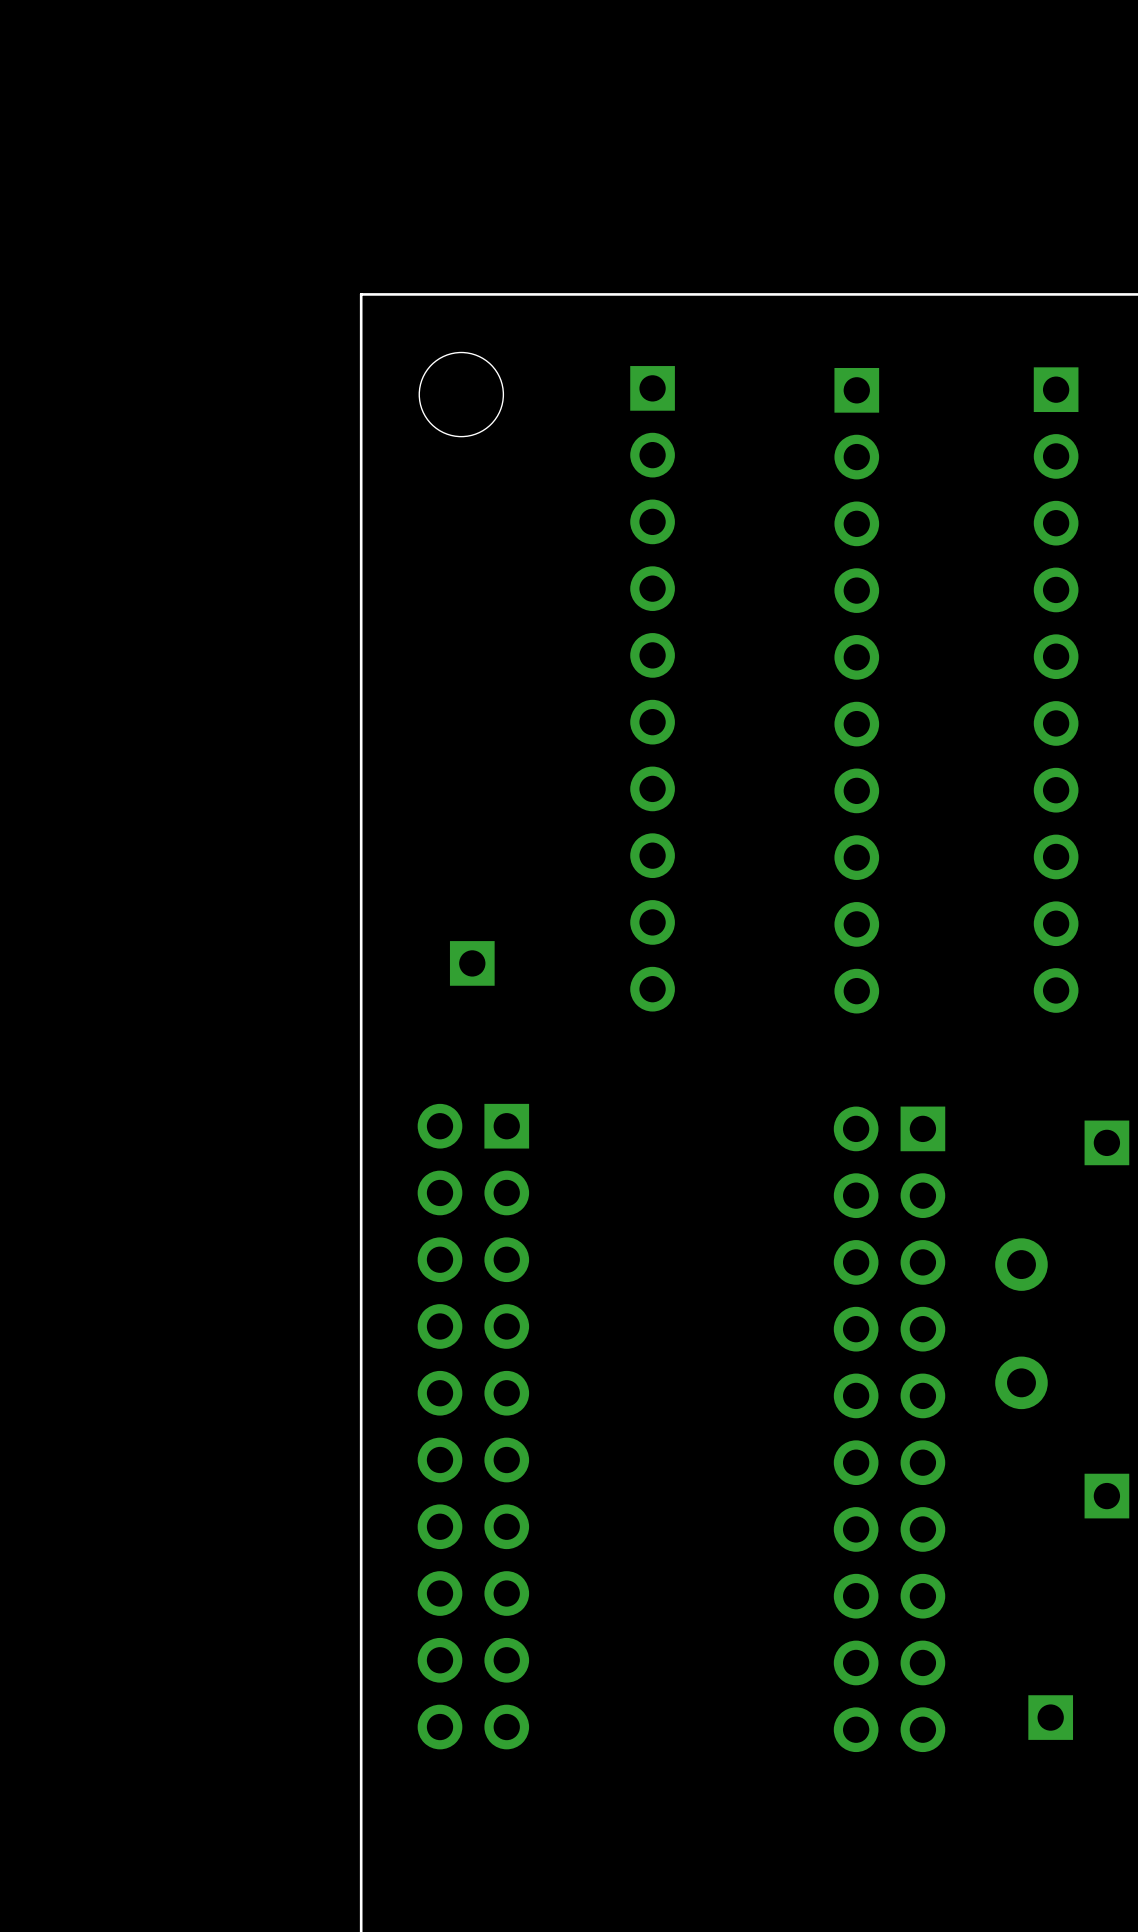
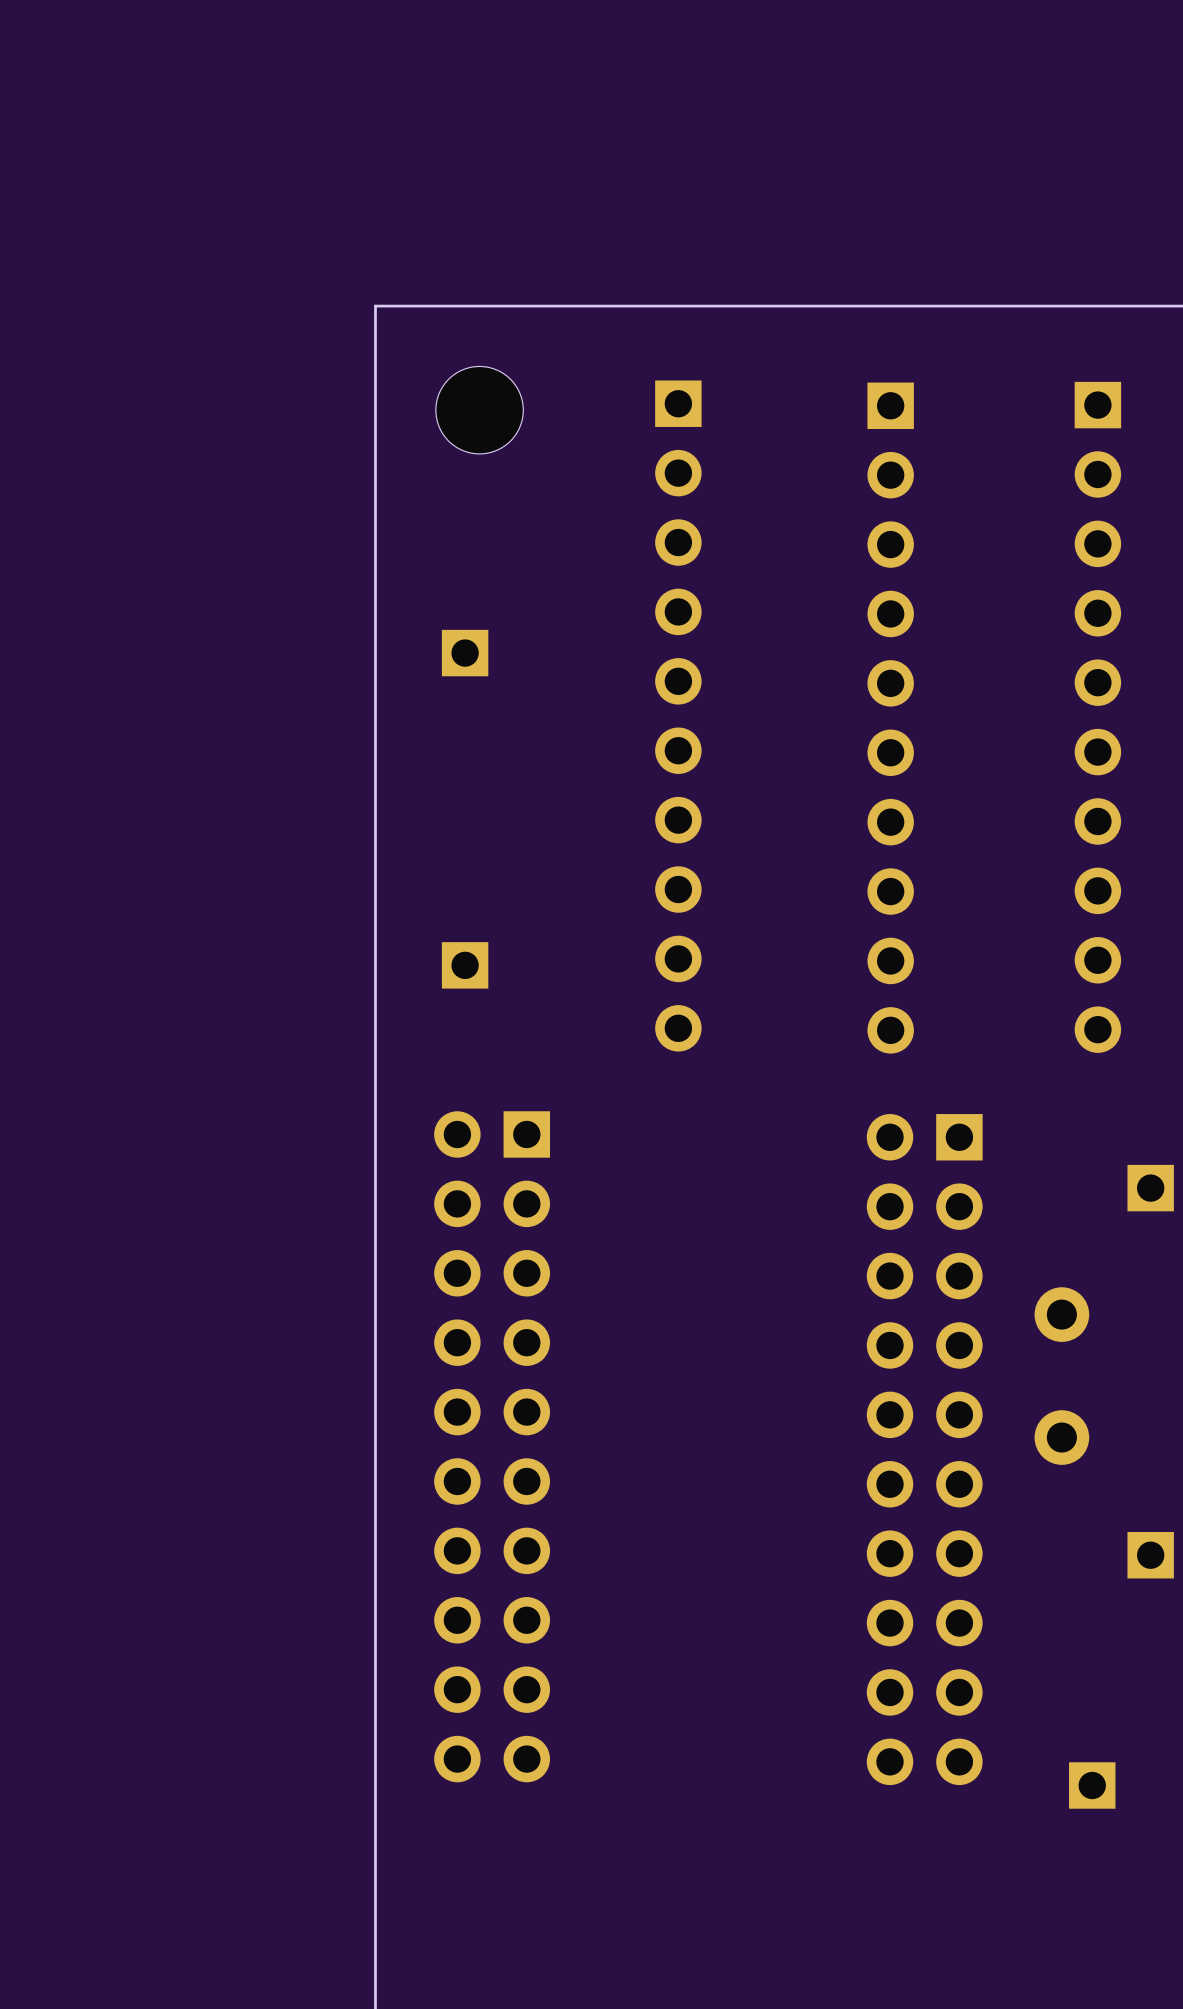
part: none -> (465, 653)
part position: (472, 963) -> (465, 965)
part position: (473, 1426) -> (492, 1446)
part position: (889, 1429) -> (924, 1449)

